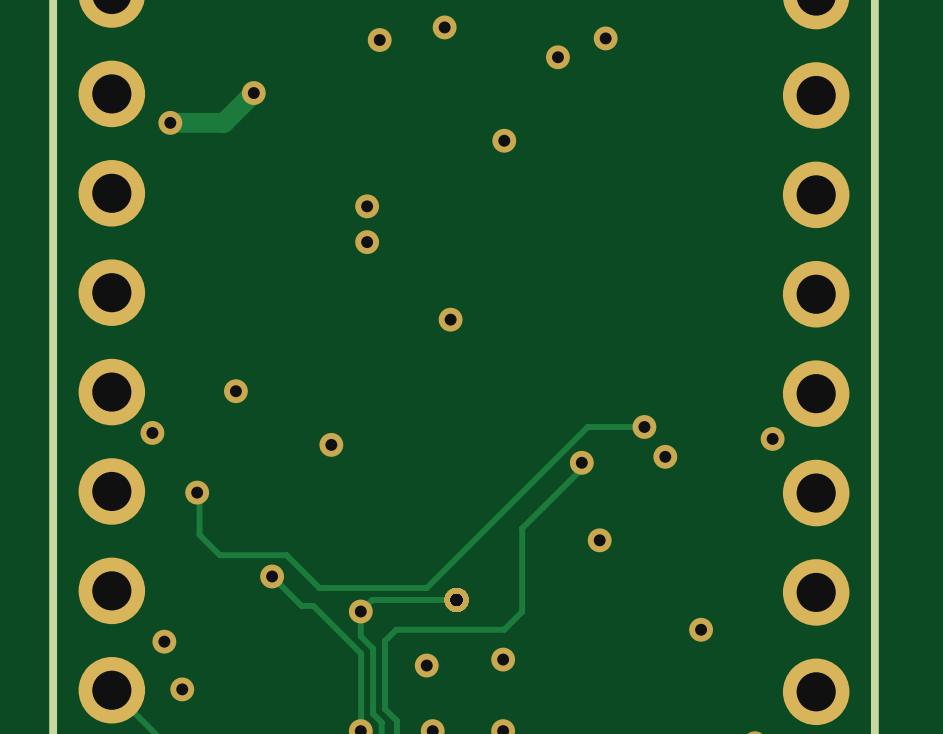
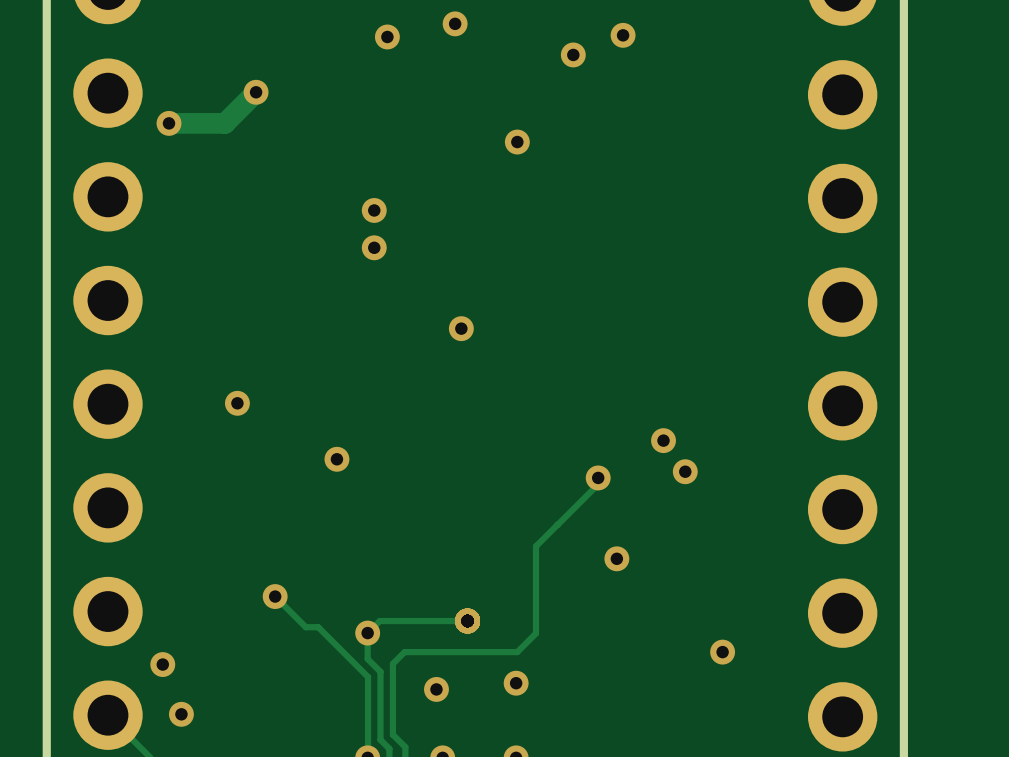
track: (644, 427) (587, 427) (426, 588) (319, 588) (286, 555) (219, 555) (199, 534) (199, 494) (197, 492) -> none
via: (152, 432) -> none
via: (772, 438) -> none
via: (197, 492) -> none

